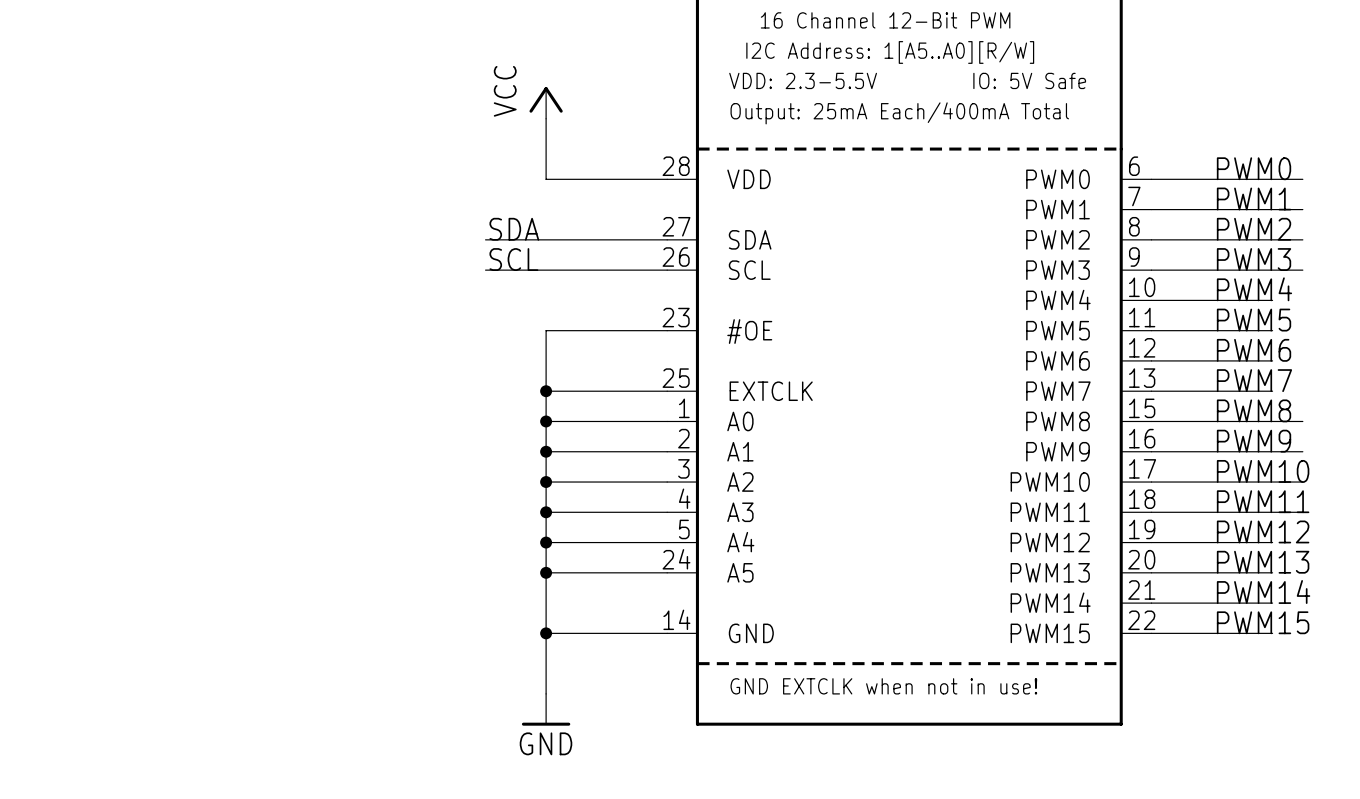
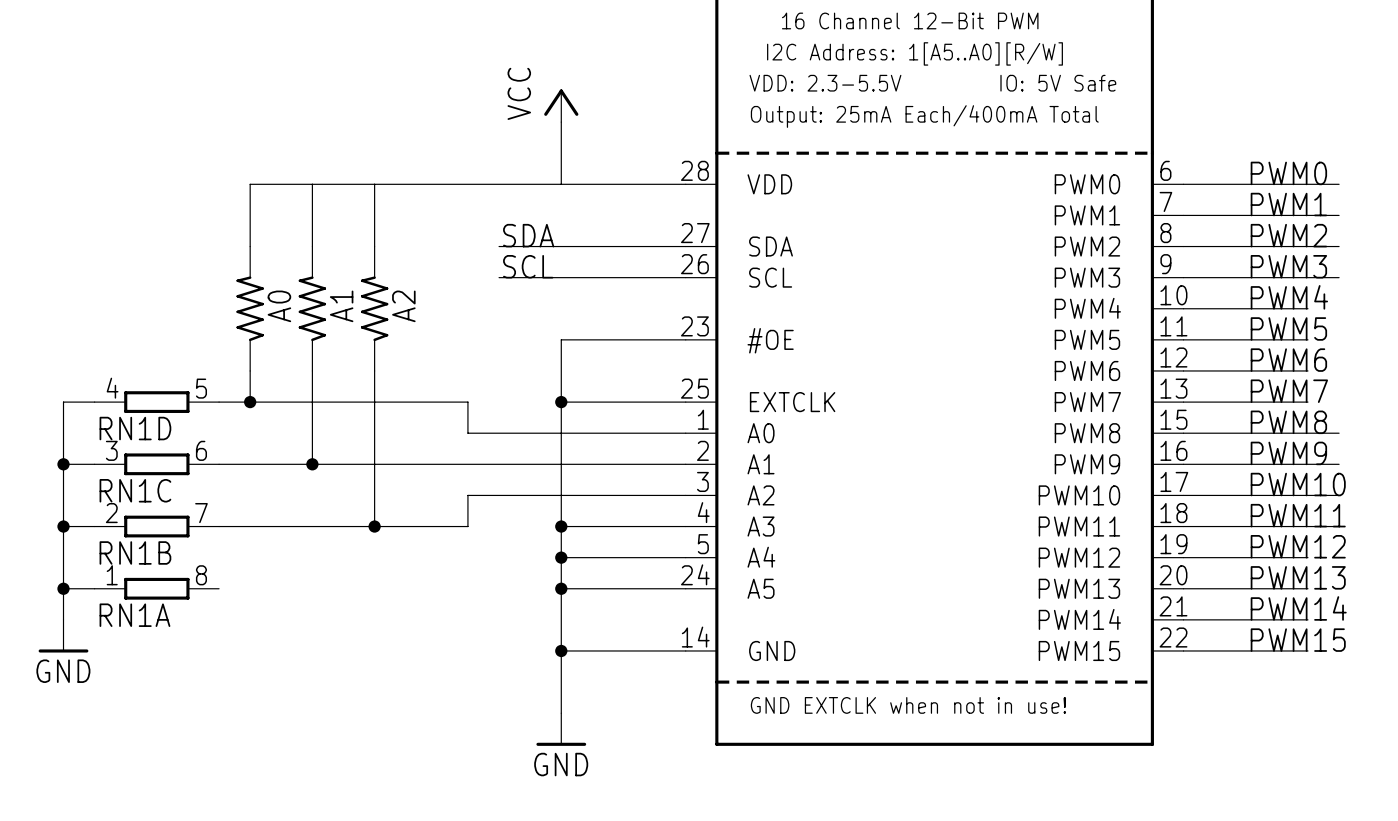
wire: none -> (312, 184) (312, 246)
wire: none -> (374, 184) (374, 246)
wire: none -> (561, 184) (250, 184) (250, 246)
A0: none -> (250, 308)
A1: none -> (312, 308)
A2: none -> (374, 308)
wire: none -> (250, 370) (250, 402)
wire: none -> (312, 370) (312, 464)
wire: none -> (374, 370) (374, 526)
wire: none -> (94, 402) (63, 402) (63, 619)
RN1D: none -> (156, 402)
wire: none -> (219, 402) (467, 402) (467, 433) (561, 433)
junction: none -> (250, 402)
junction: (546, 421) -> none
wire: none -> (63, 464) (94, 464)
junction: none -> (63, 464)
RN1C: none -> (156, 464)
wire: none -> (219, 464) (561, 464)
junction: none -> (312, 464)
junction: (546, 451) -> none
wire: none -> (561, 495) (467, 495) (467, 526) (219, 526)
junction: (546, 482) -> none
wire: none -> (63, 526) (94, 526)
junction: none -> (63, 526)
RN1B: none -> (156, 526)
junction: none -> (374, 526)
wire: none -> (63, 588) (94, 588)
junction: none -> (63, 588)
RN1A: none -> (156, 588)
power symbol: none -> GND (63, 636)

